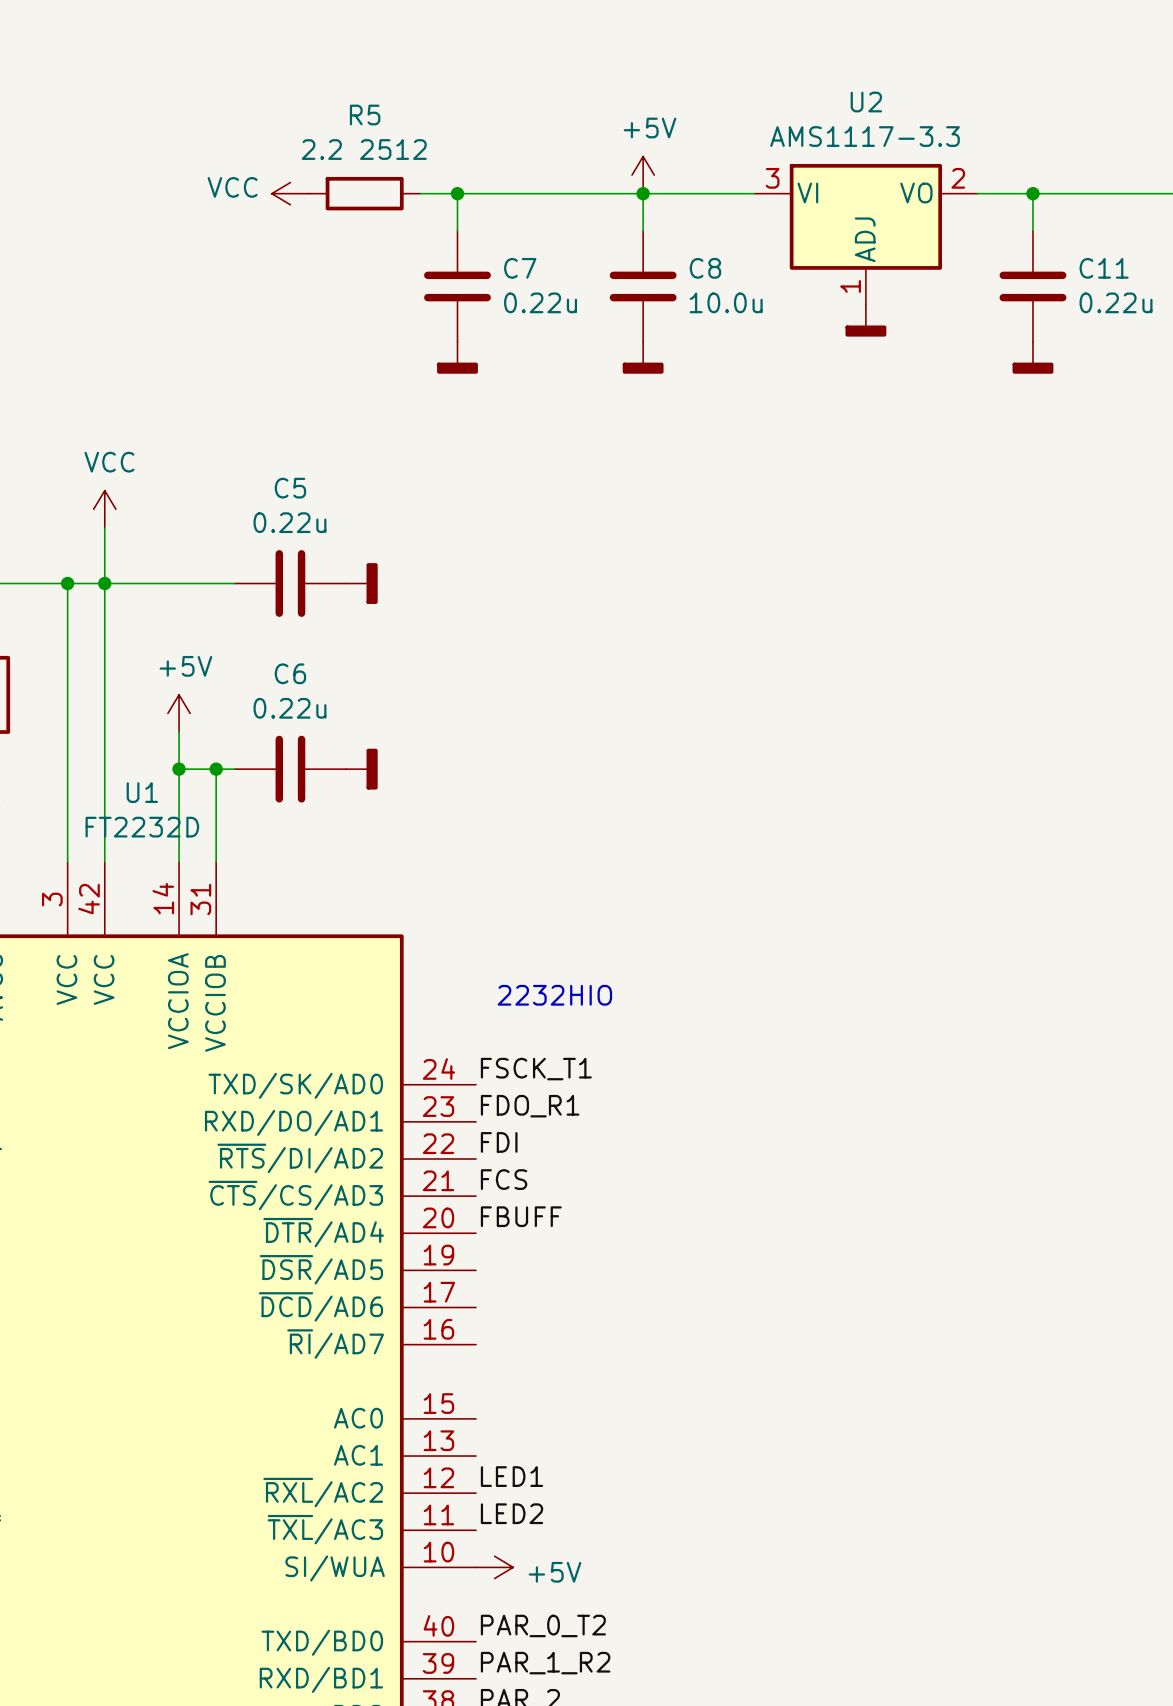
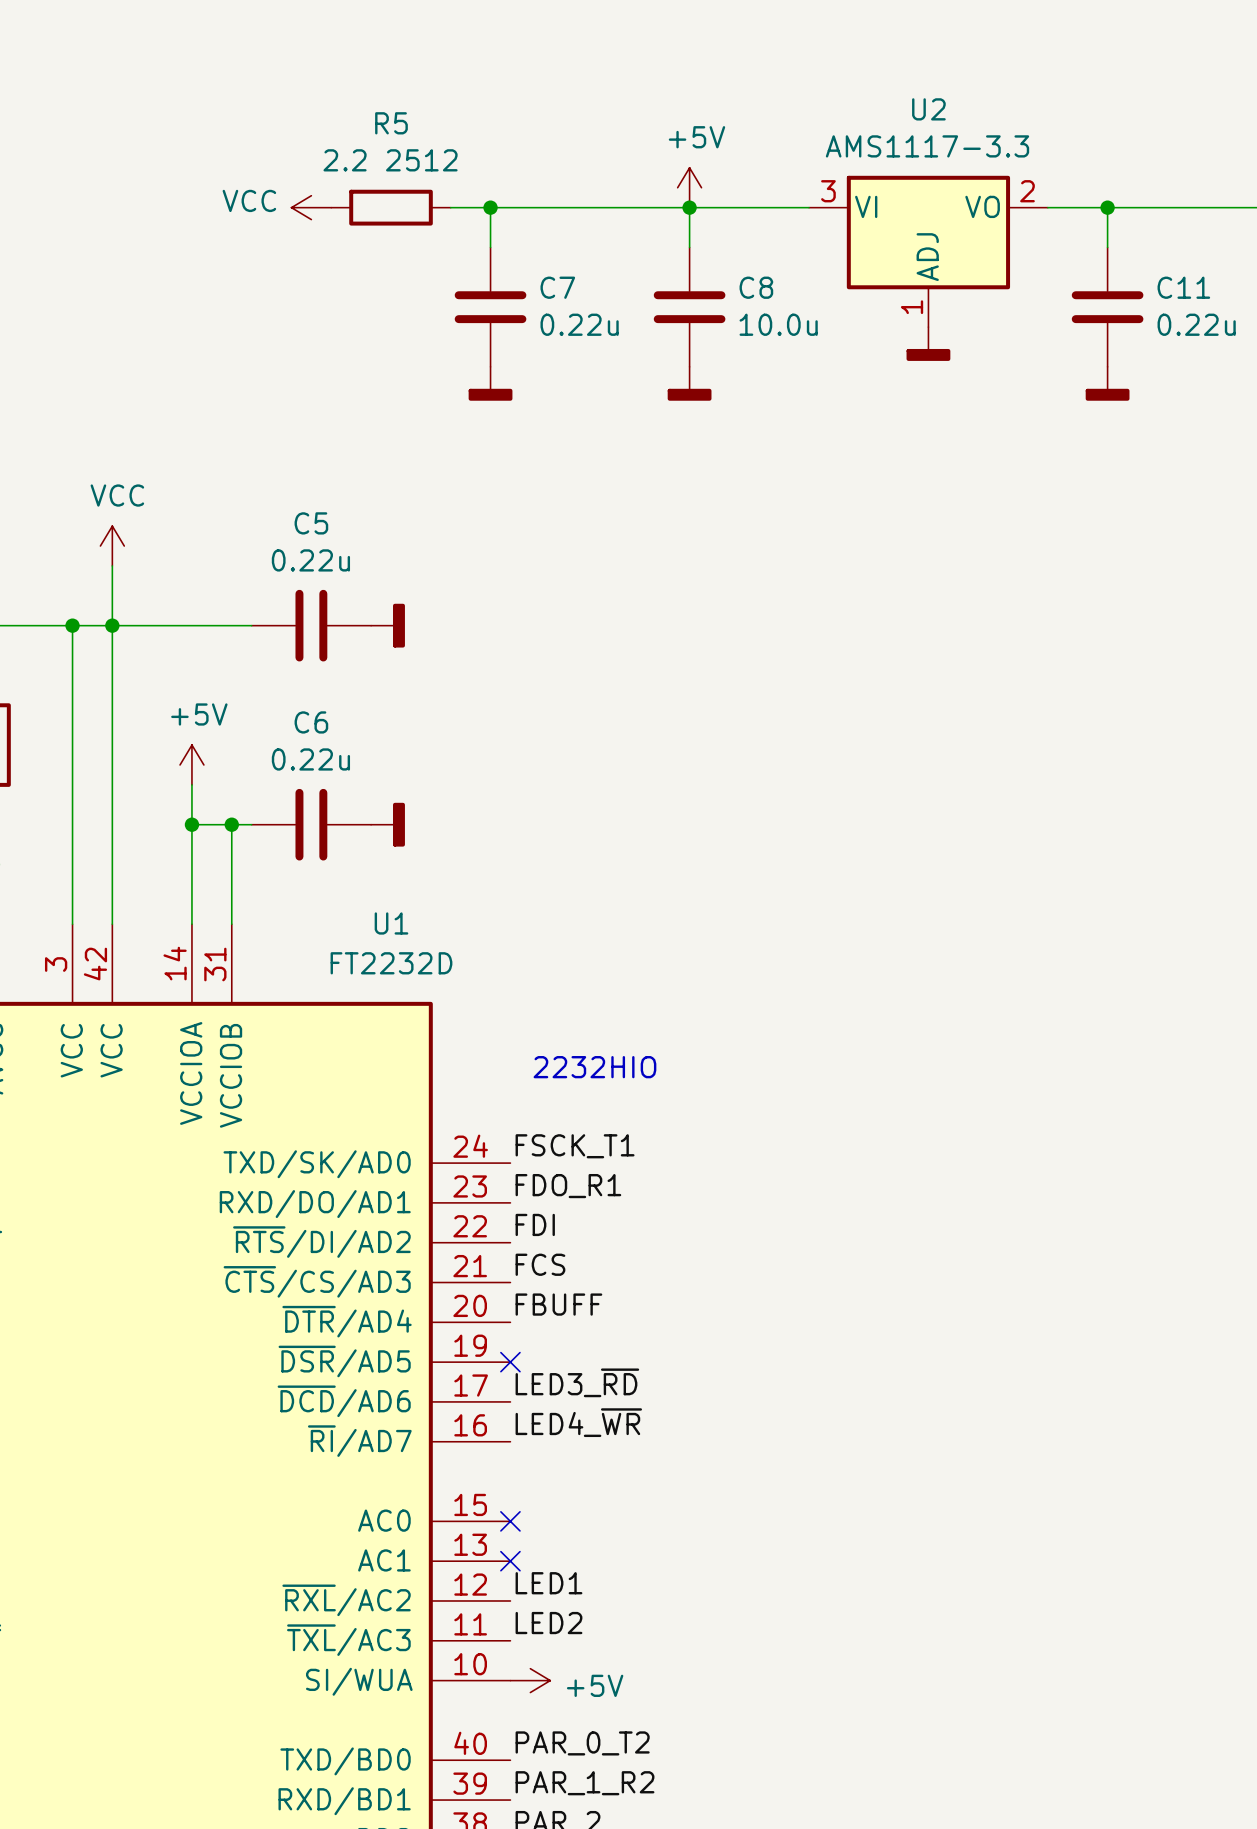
U1 name position: U1 (142, 792) -> U1 (391, 923)
U1 value position: FT2232D (142, 827) -> FT2232D (391, 963)
no-connect mark: none -> (510, 1362)
label: none -> LED3_~{RD} (577, 1382)
label: none -> LED4_~{WR} (578, 1422)
no-connect mark: none -> (510, 1521)
no-connect mark: none -> (510, 1561)

